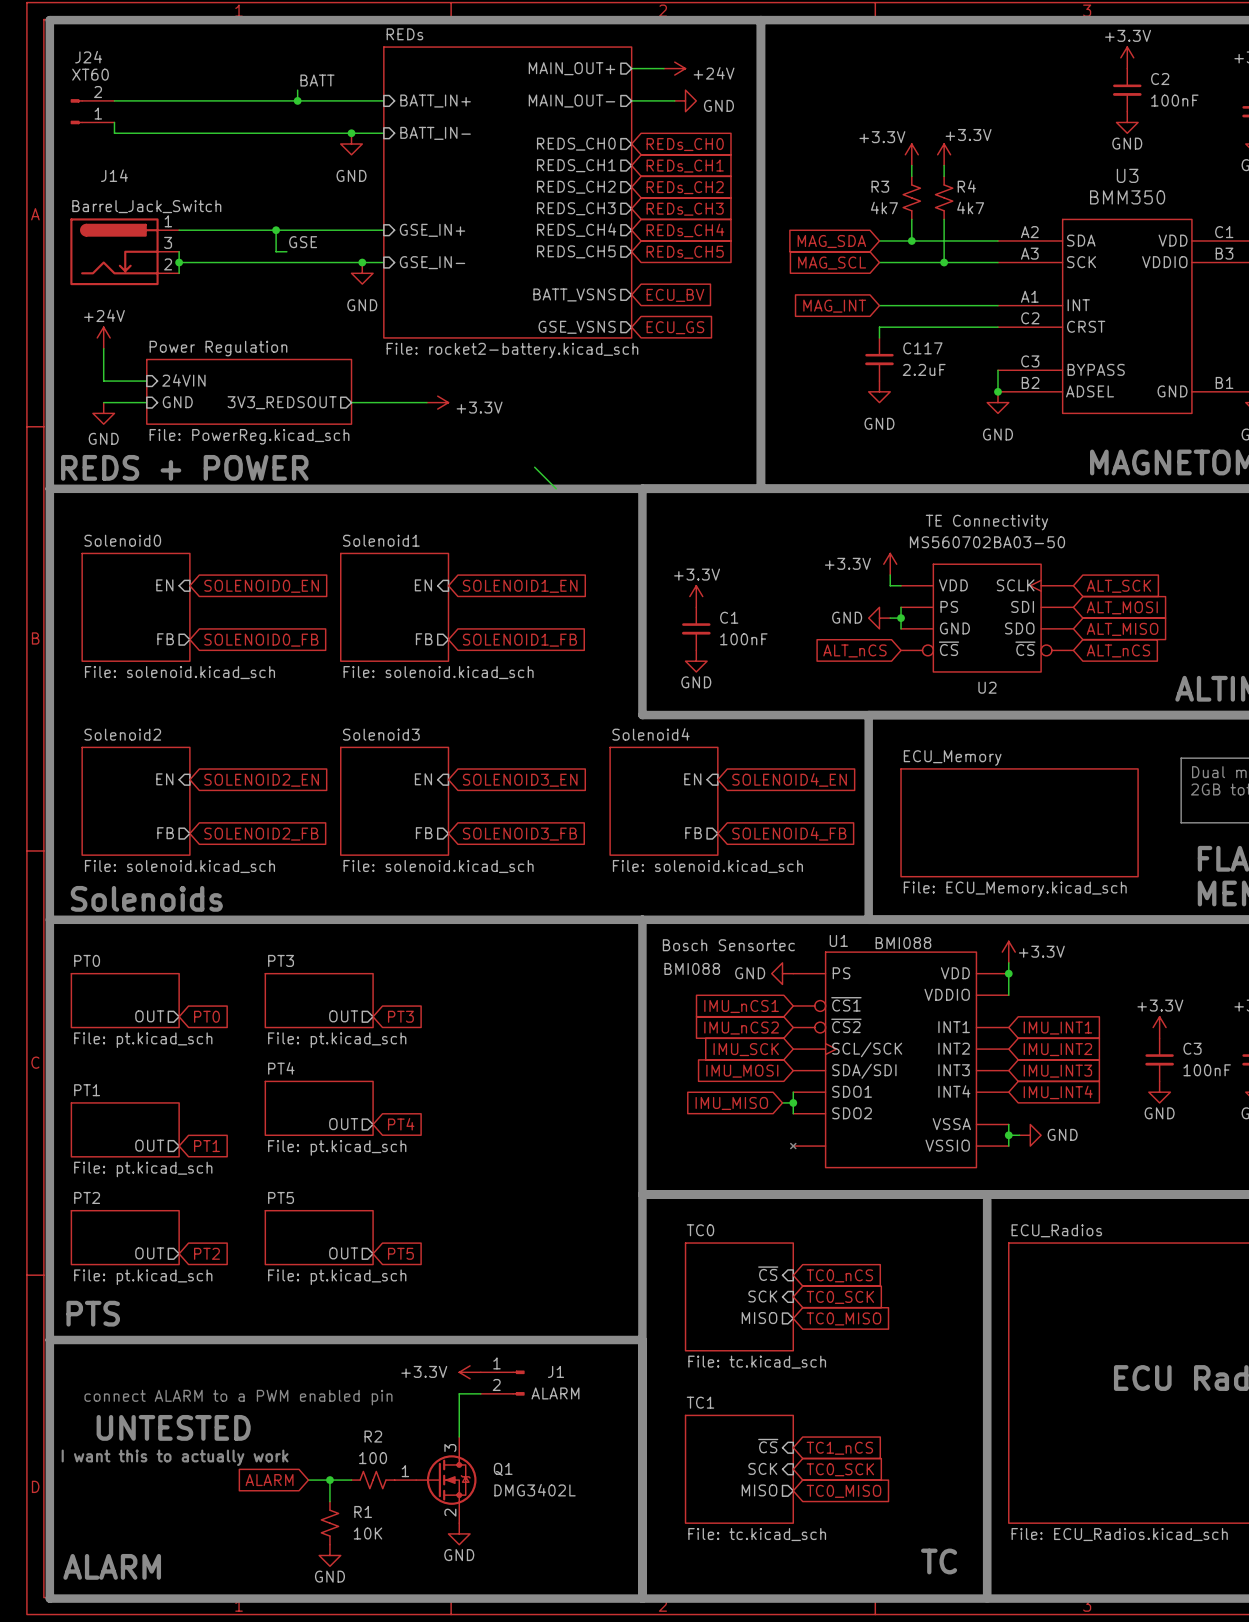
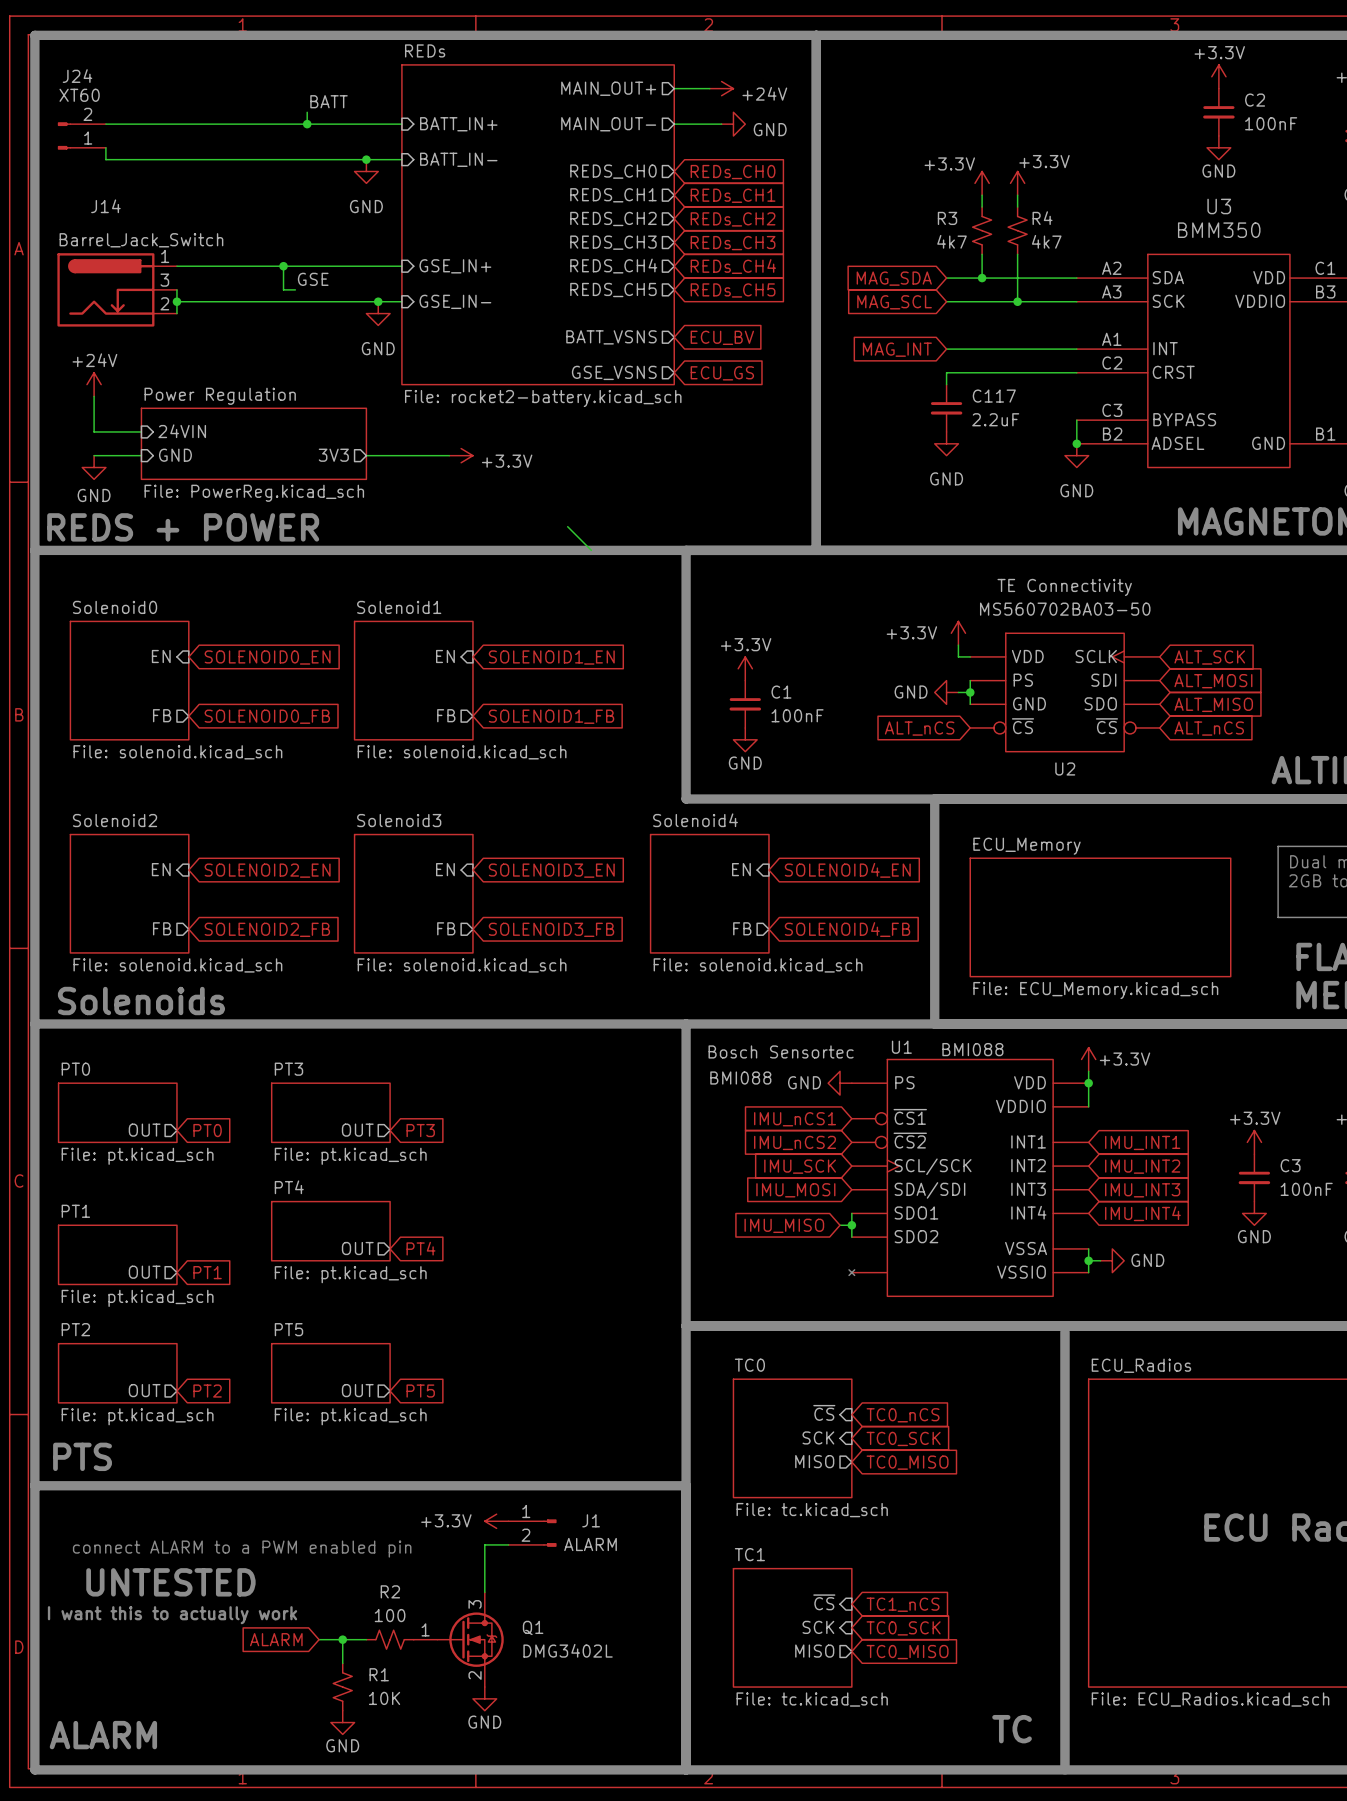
sheet pin: 3V3_REDSOUT (282, 402) -> 3V3 (333, 455)

